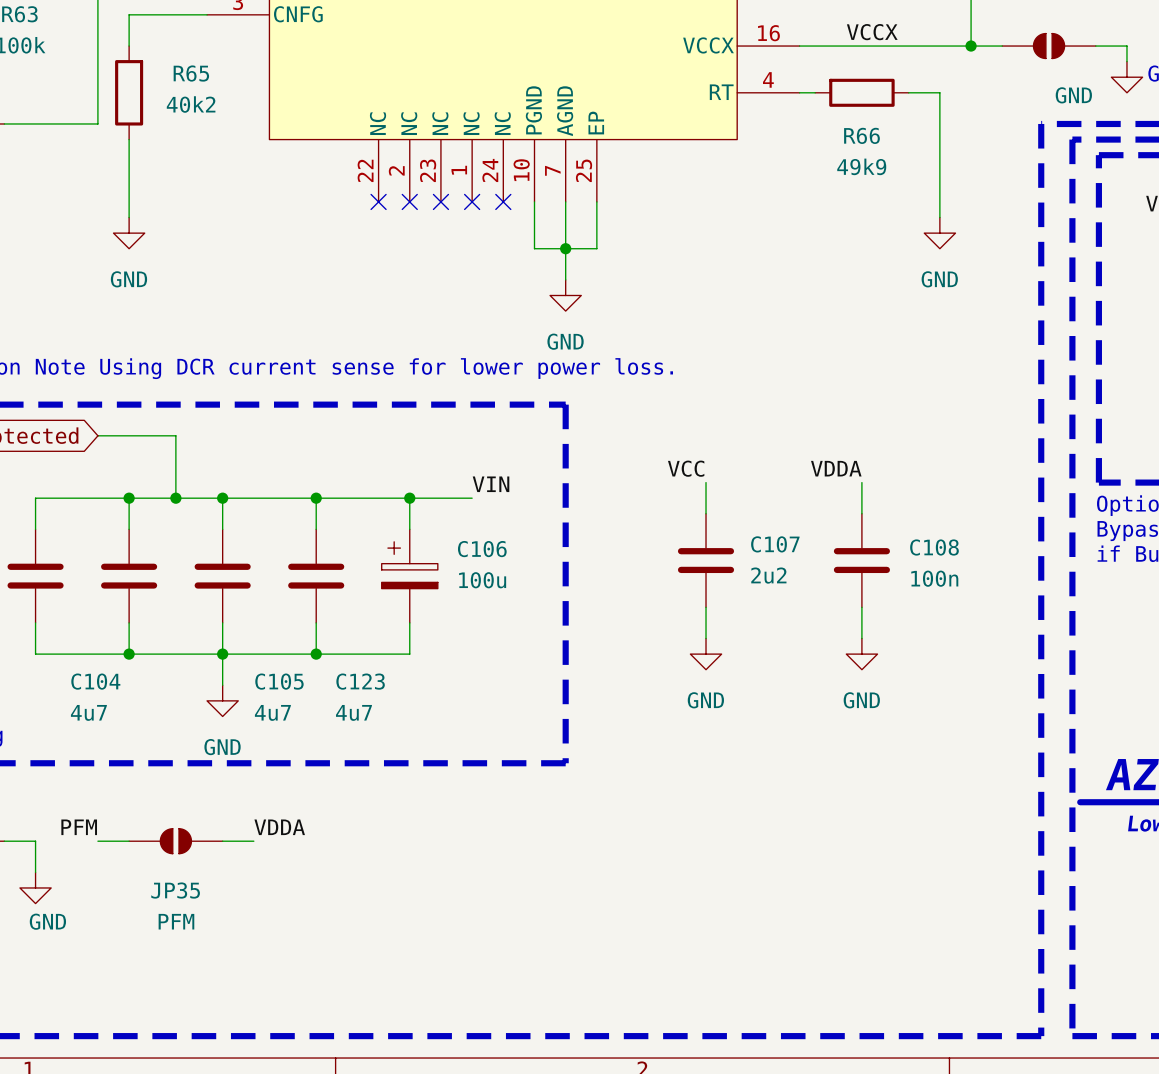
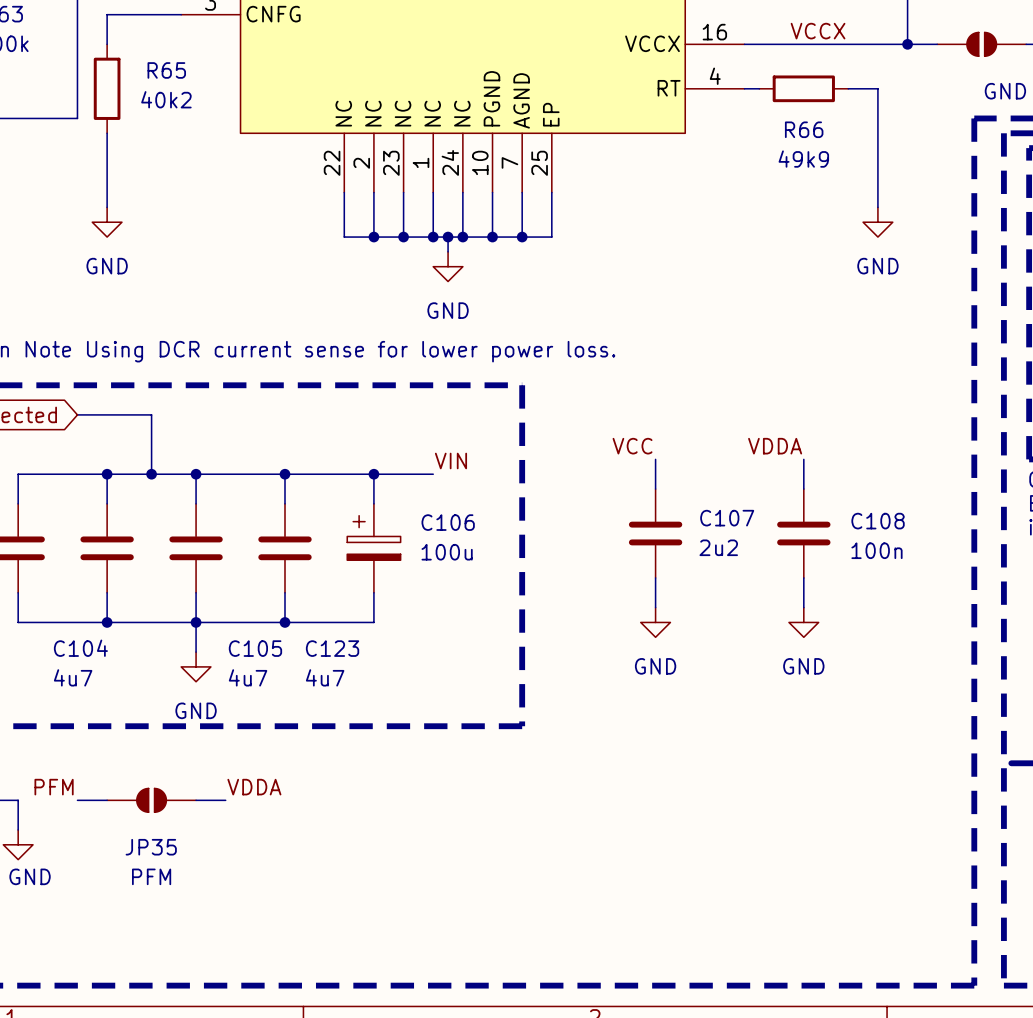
wire: none -> (344, 192) (344, 237) (492, 237)
no-connect mark: (378, 201) -> none
wire: none -> (373, 192) (373, 237)
no-connect mark: (409, 201) -> none
wire: none -> (403, 192) (403, 237)
no-connect mark: (440, 201) -> none
wire: none -> (433, 192) (433, 237)
no-connect mark: (472, 201) -> none
wire: none -> (462, 192) (462, 237)
no-connect mark: (503, 201) -> none
junction: none -> (373, 237)
junction: none -> (403, 237)
junction: none -> (433, 237)
wire: none -> (448, 237) (448, 251)
junction: none -> (448, 237)
junction: none -> (462, 237)
junction: none -> (492, 237)
wire: (565, 248) (565, 279) -> none
power symbol position: GND (565, 295) -> GND (448, 266)

